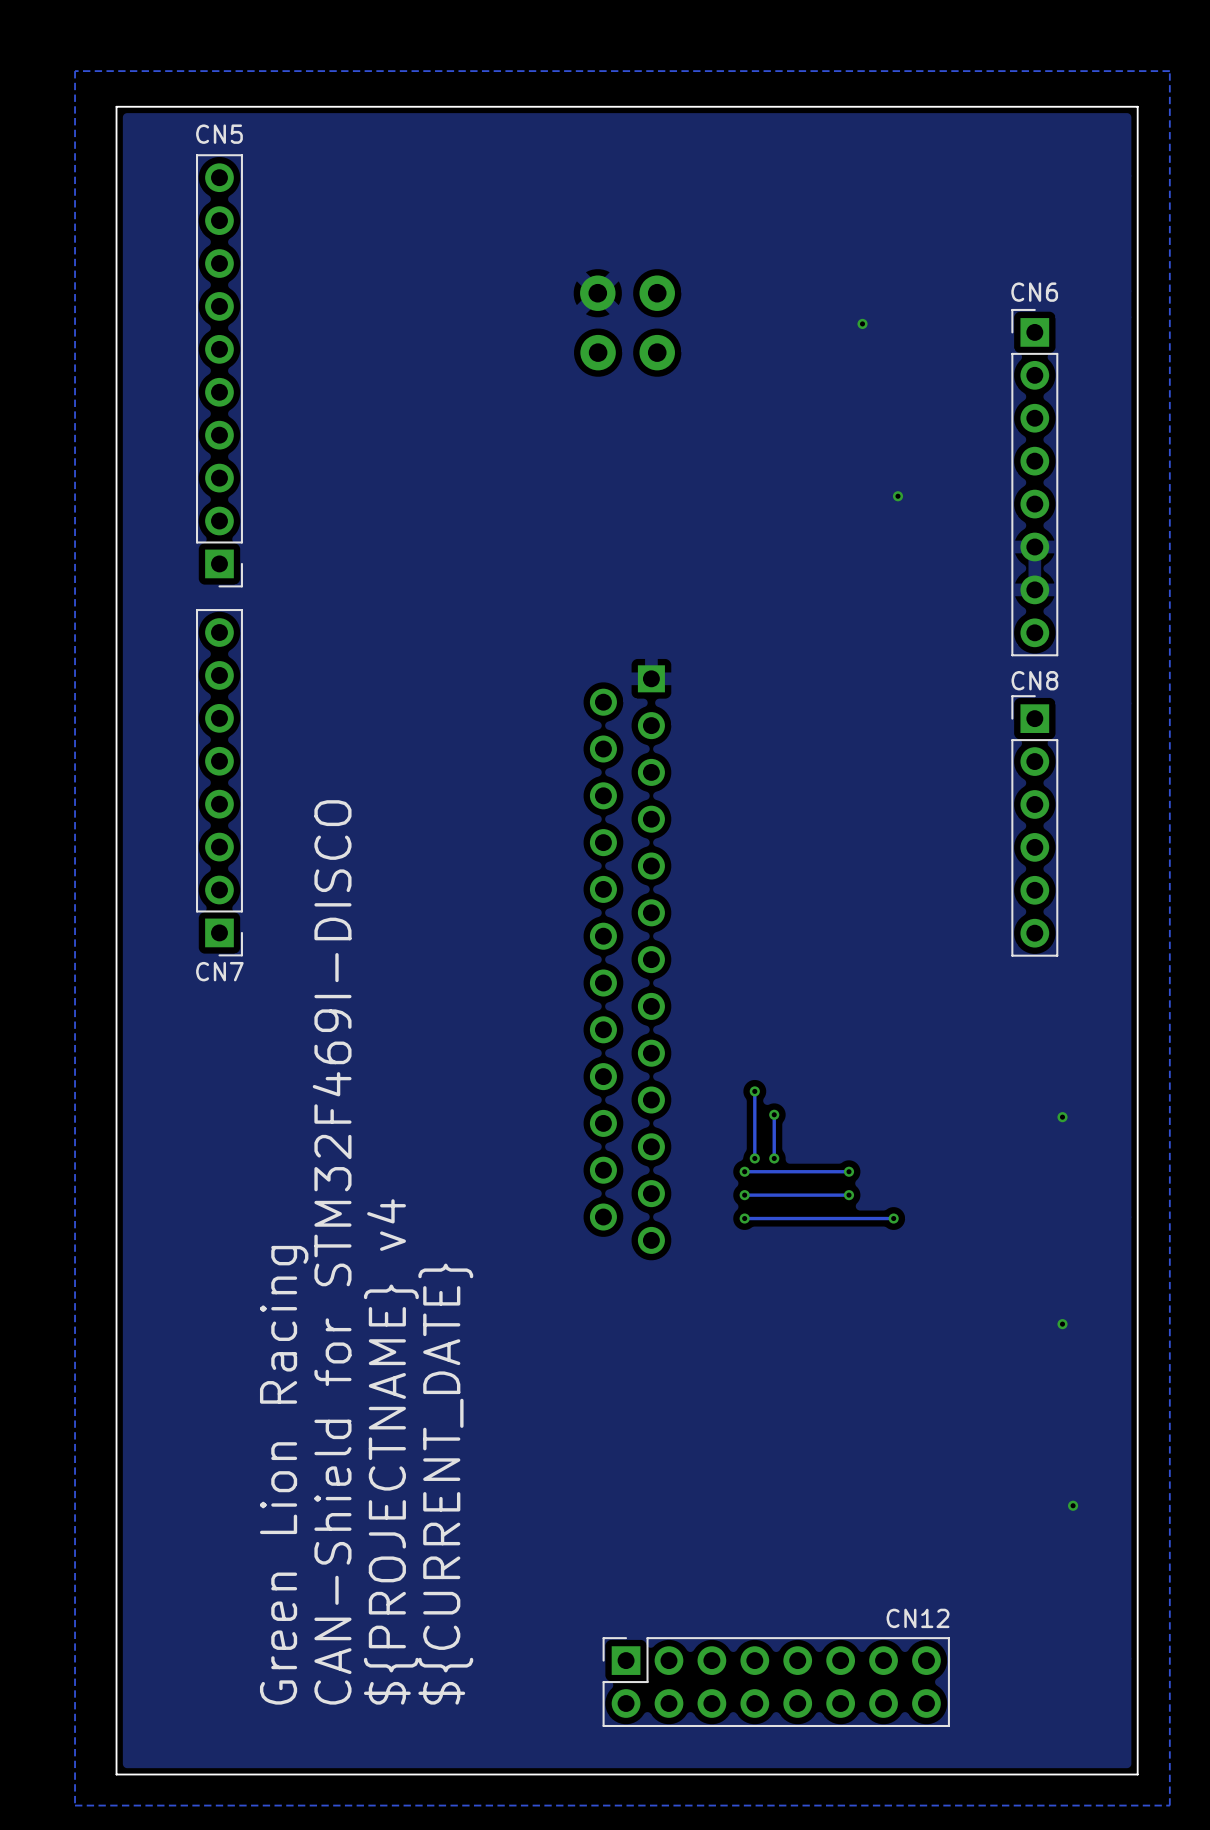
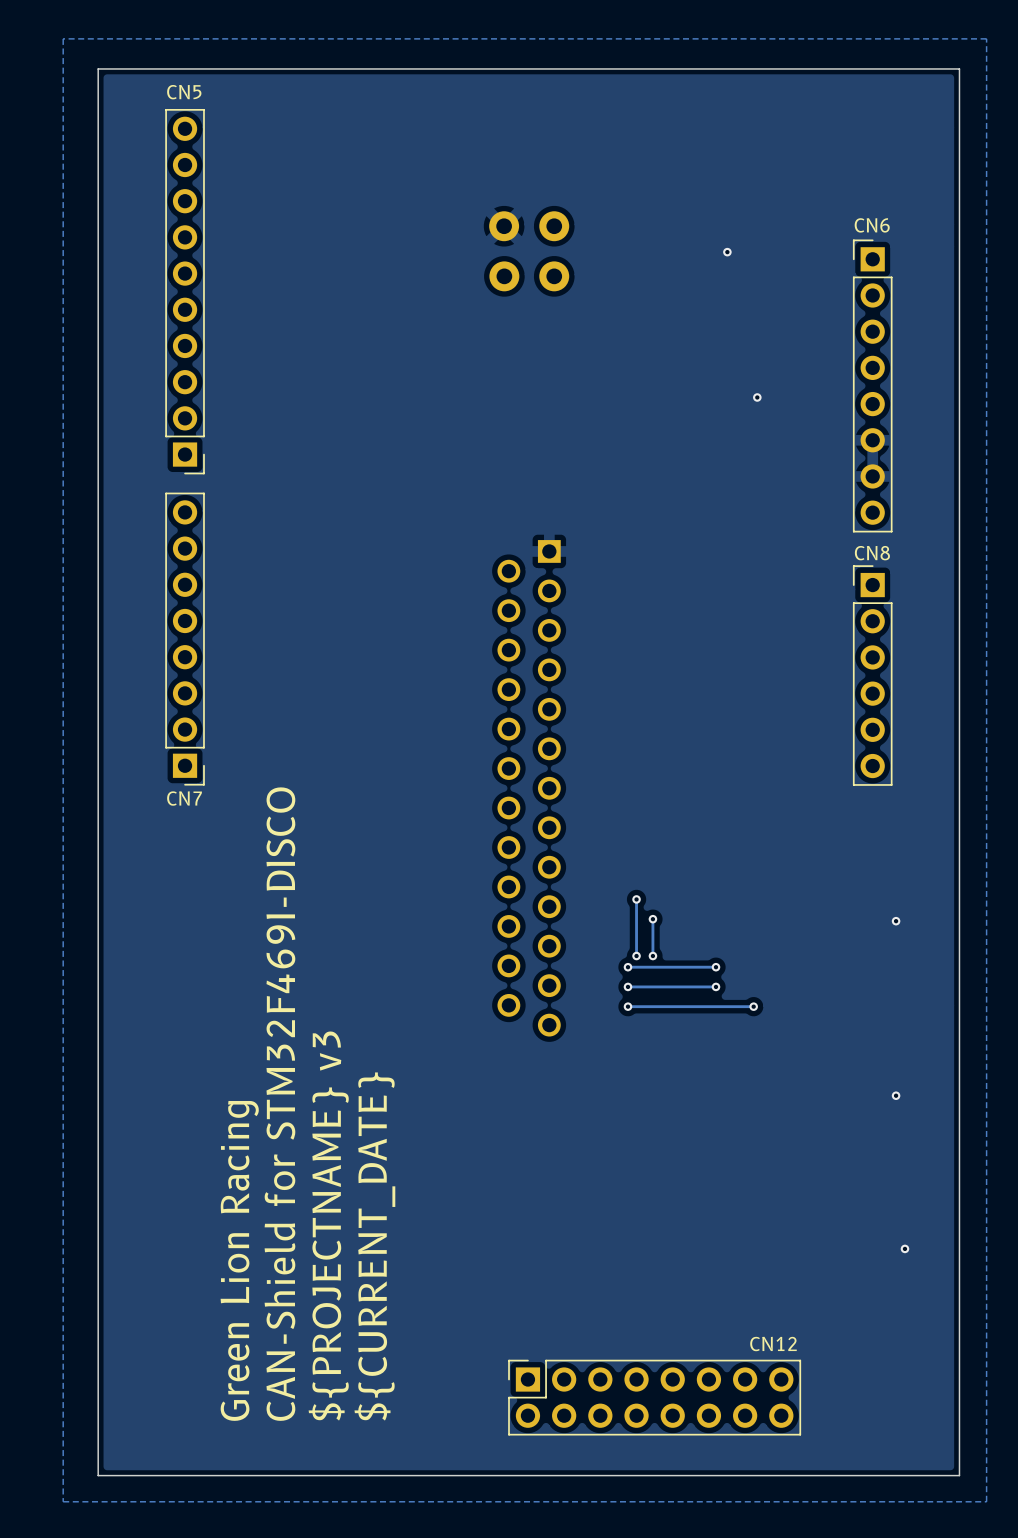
text: ${PROJECTNAME} v4 (391, 1451) -> ${PROJECTNAME} v3 (328, 1226)

